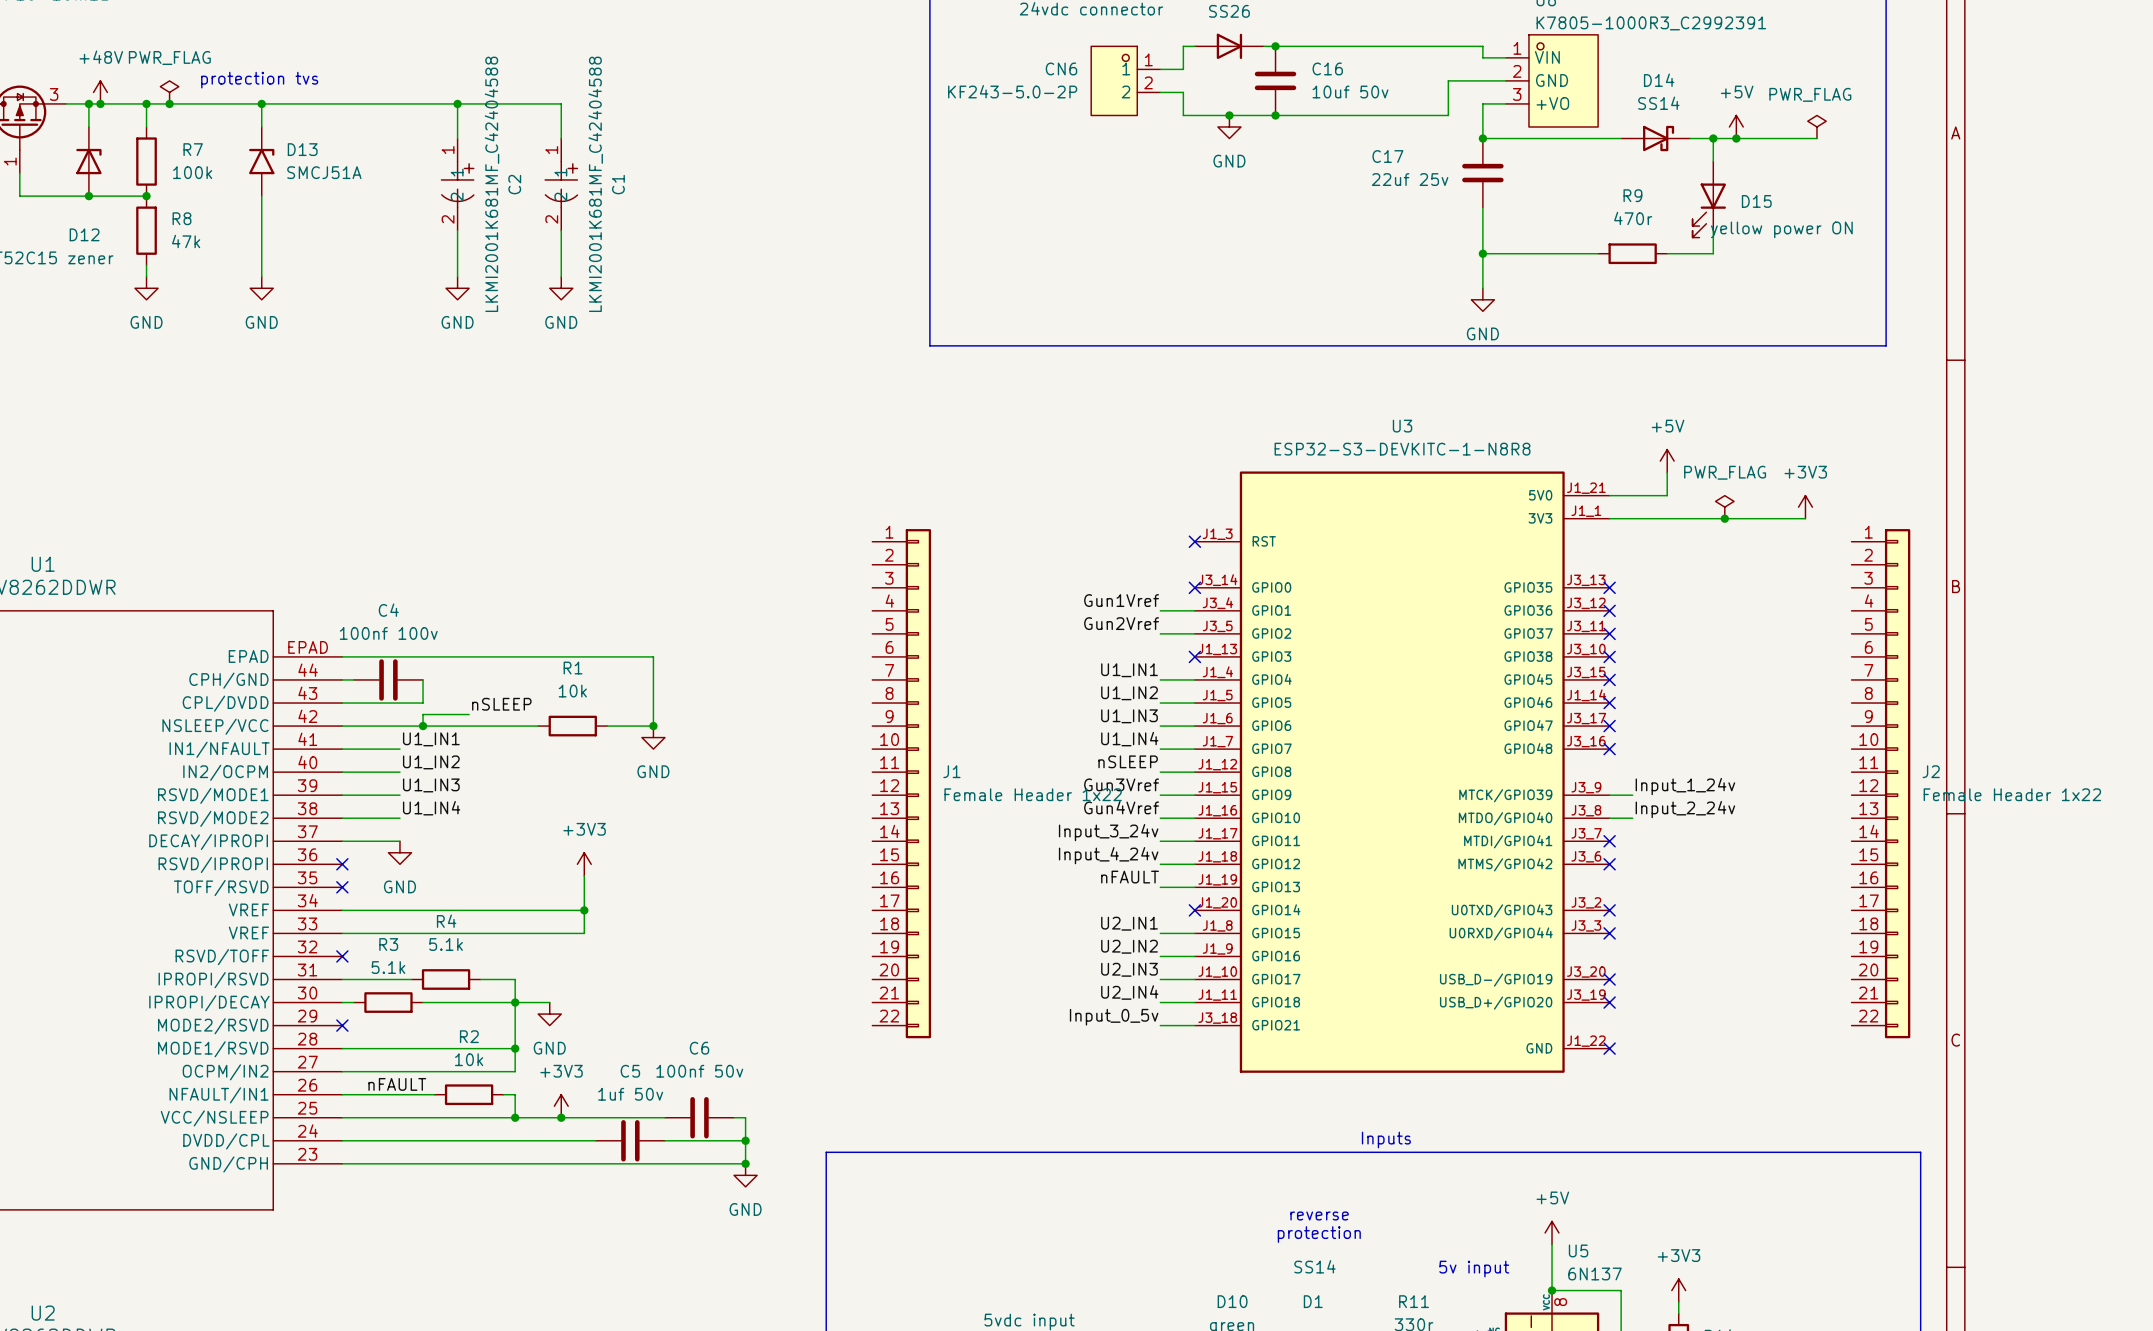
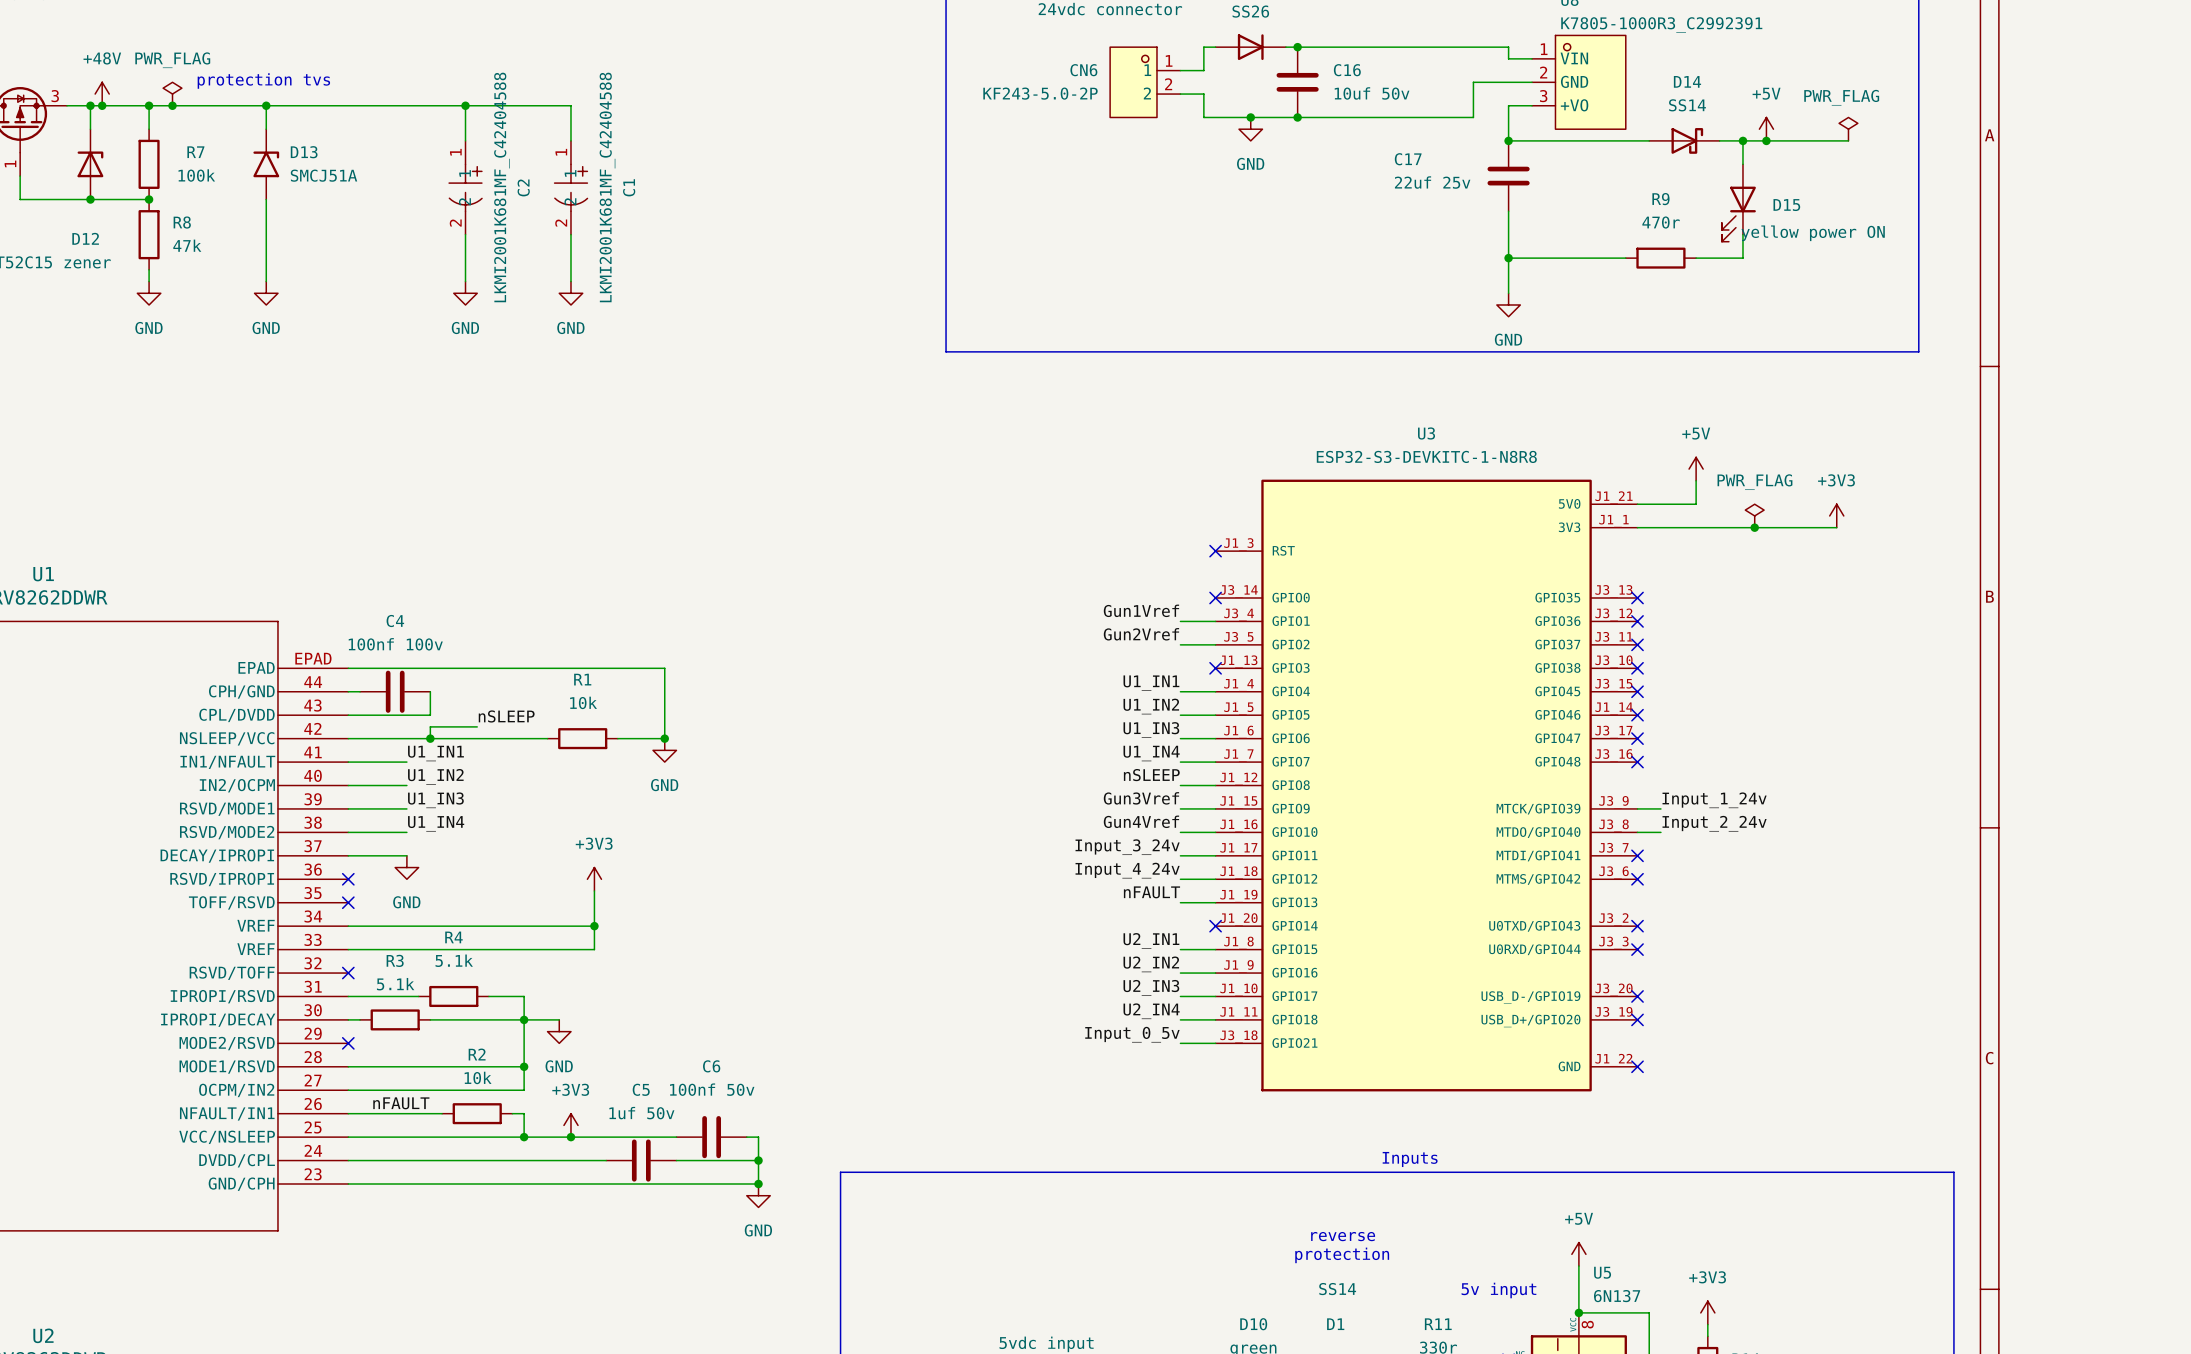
J1: Female Header 1x22 (901, 783) -> none
J2: Female Header 1x22 (1880, 783) -> none

